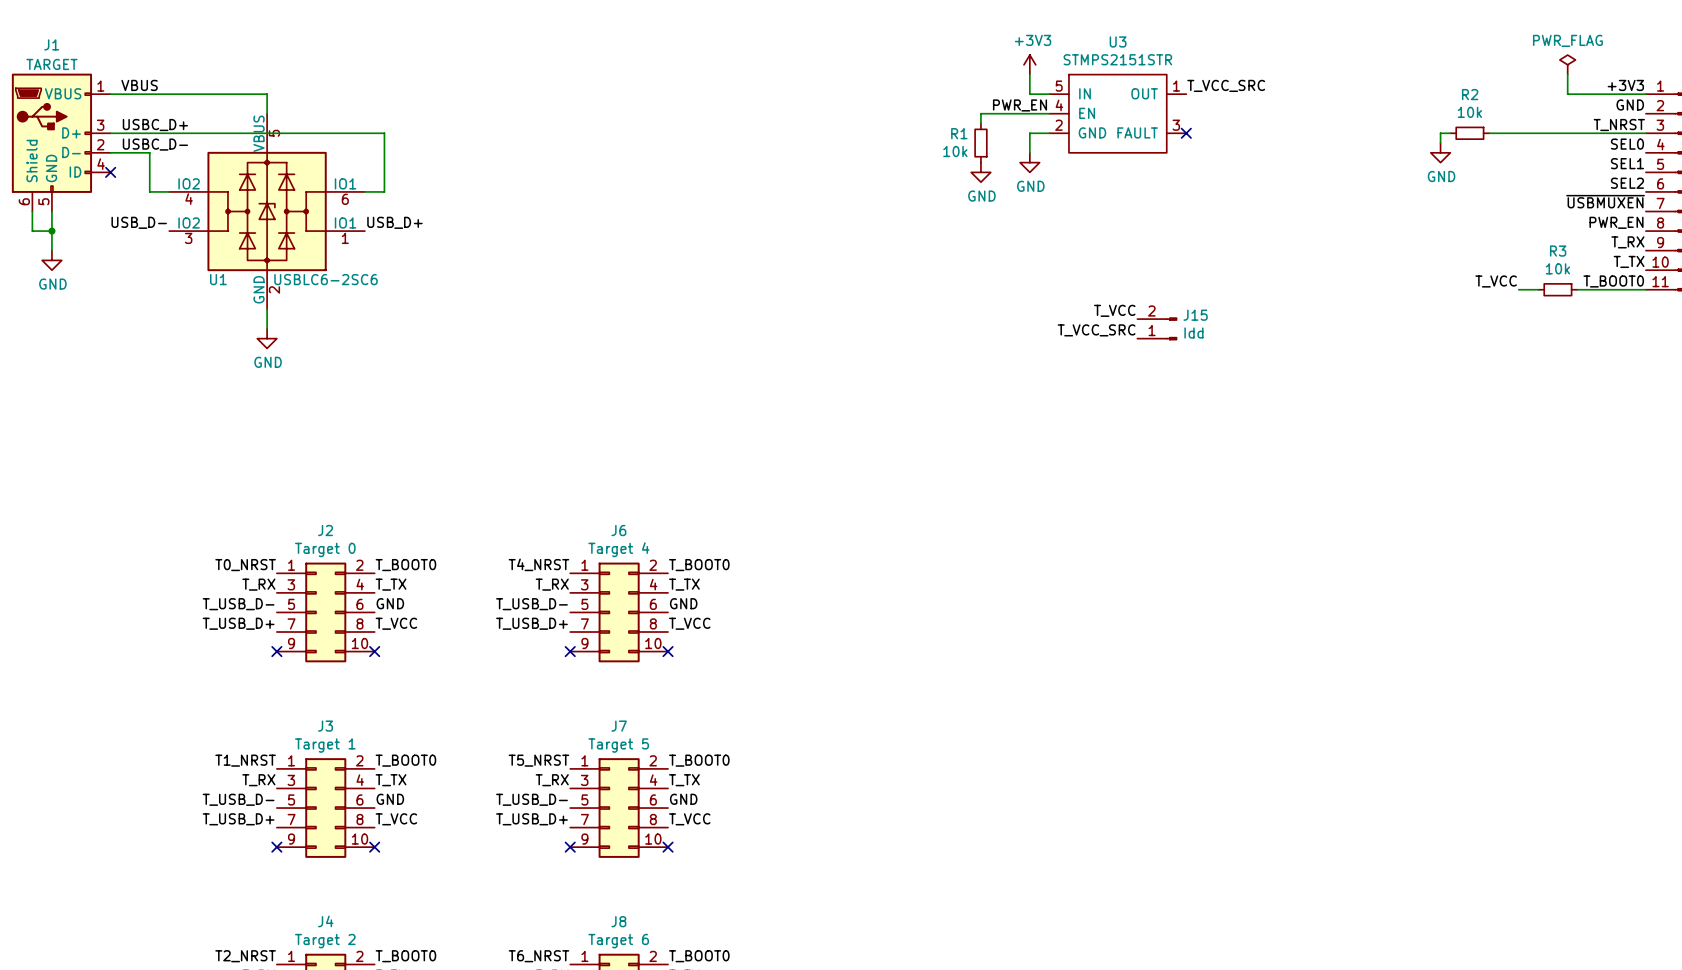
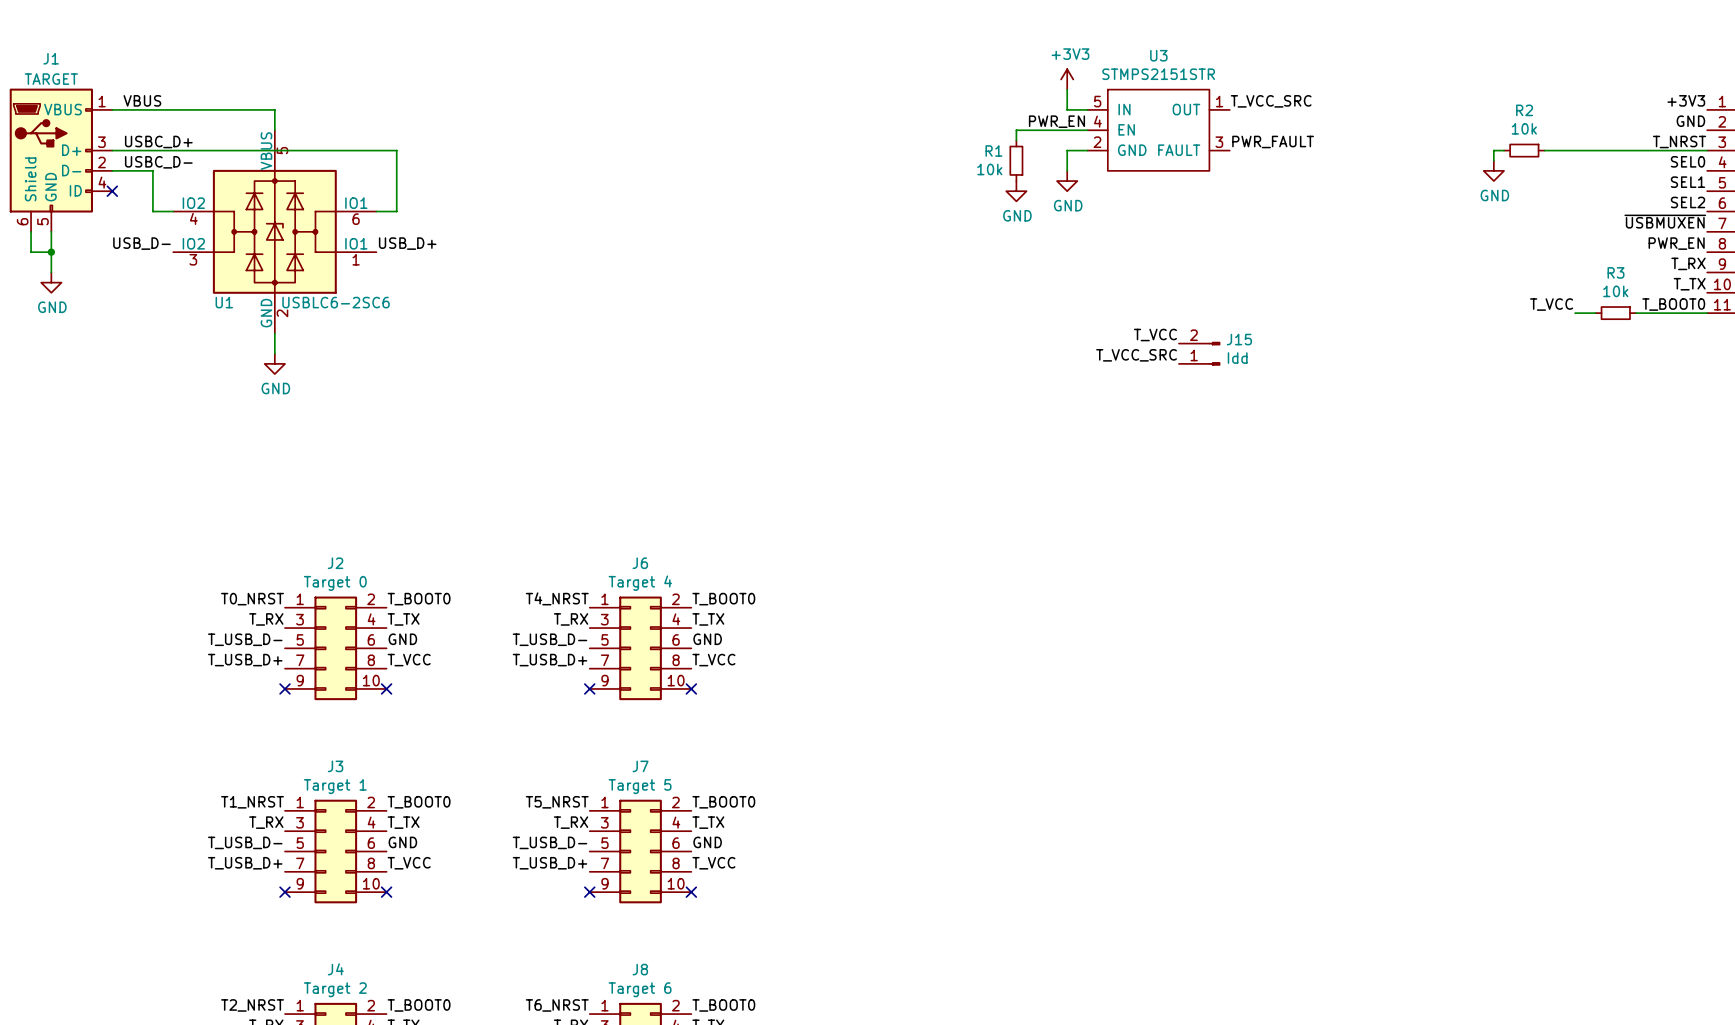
power symbol: PWR_FLAG (1567, 64) -> none
wire: (1567, 74) (1567, 94) (1645, 94) -> none
label: none -> PWR_FAULT (1273, 141)
no-connect mark: (1186, 133) -> none

